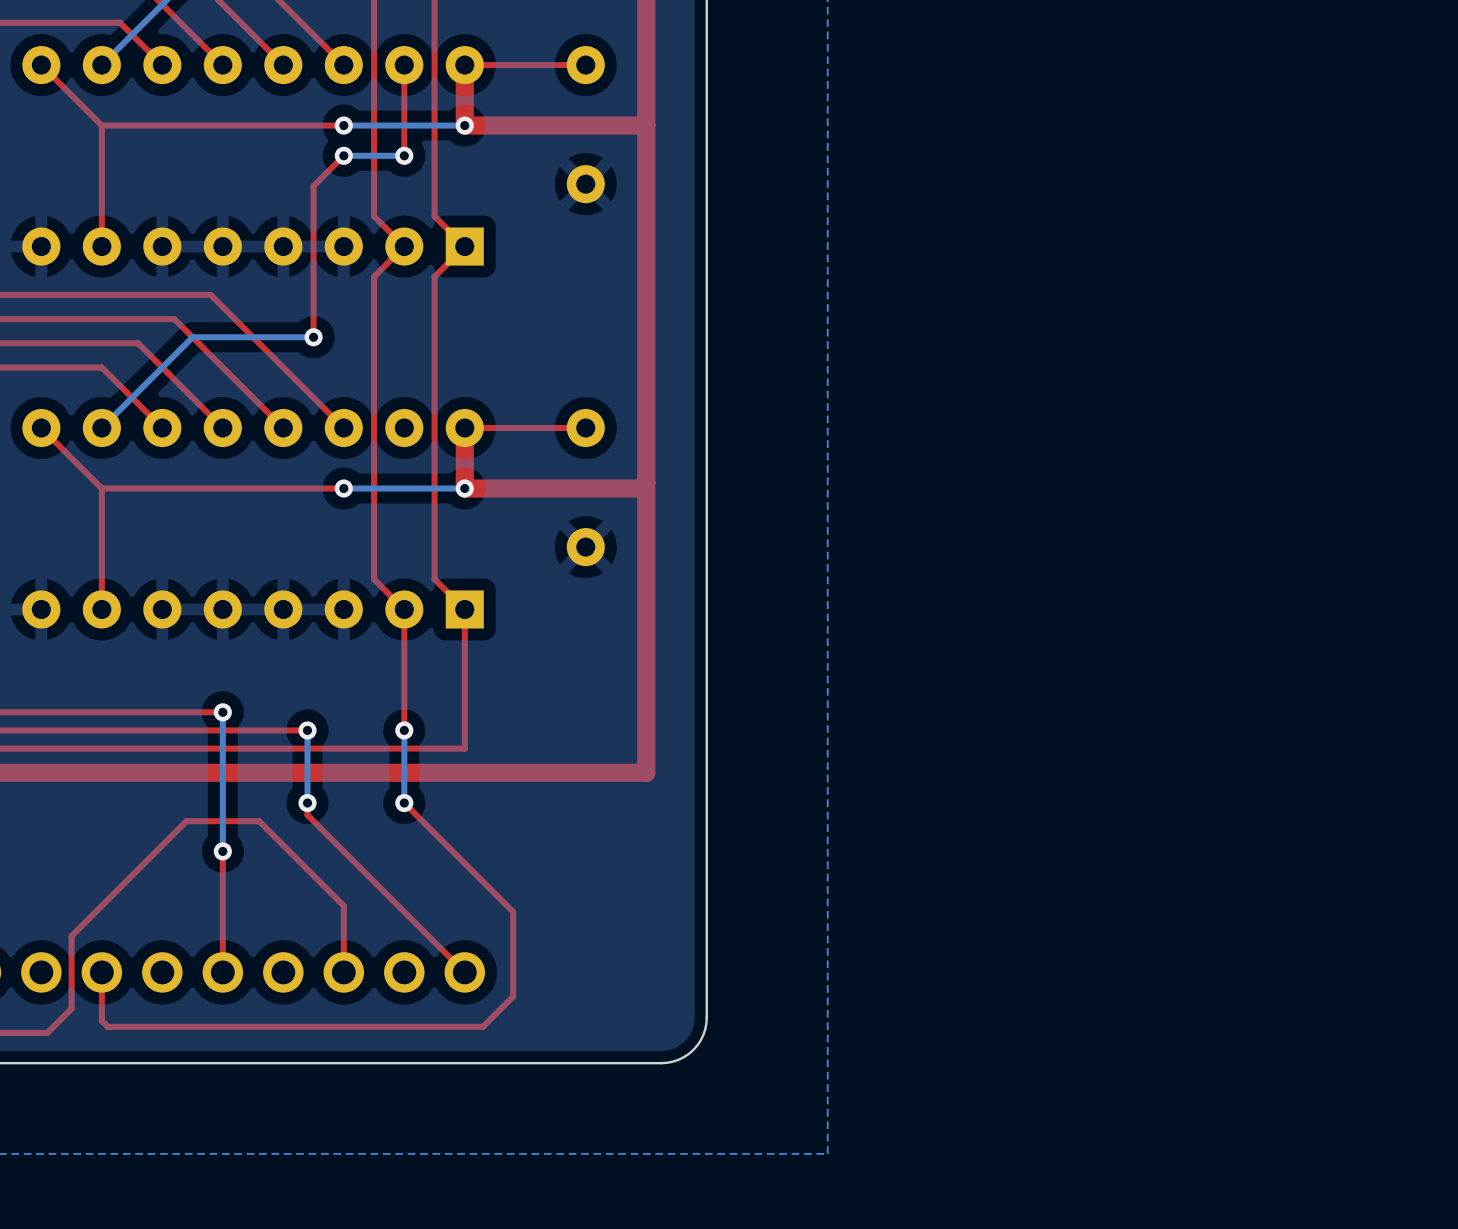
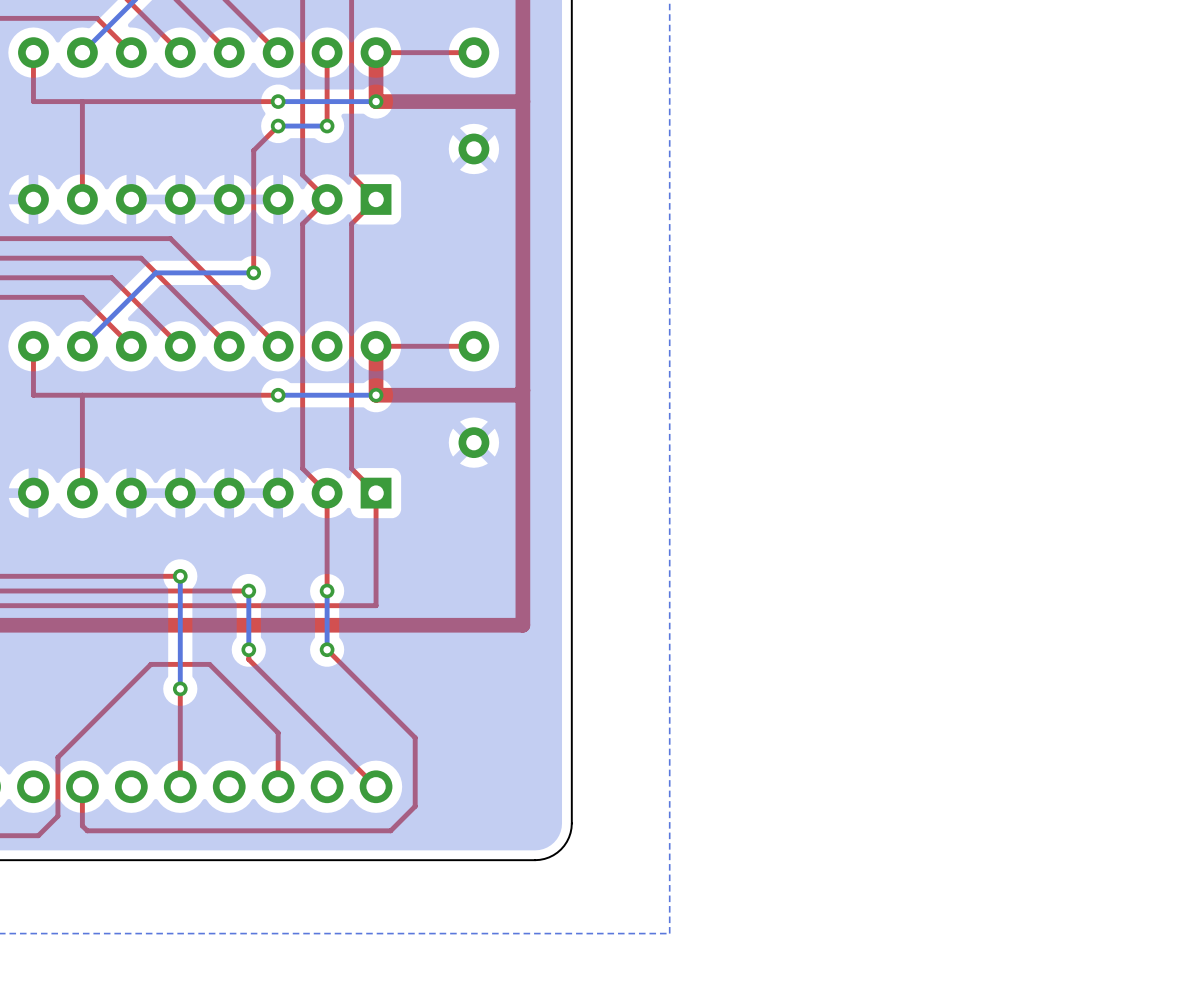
top track: (41, 65) (101, 125) -> (33, 52) (33, 101) (82, 101)
top track: (41, 428) (101, 488) -> (33, 346) (33, 395) (82, 395)

